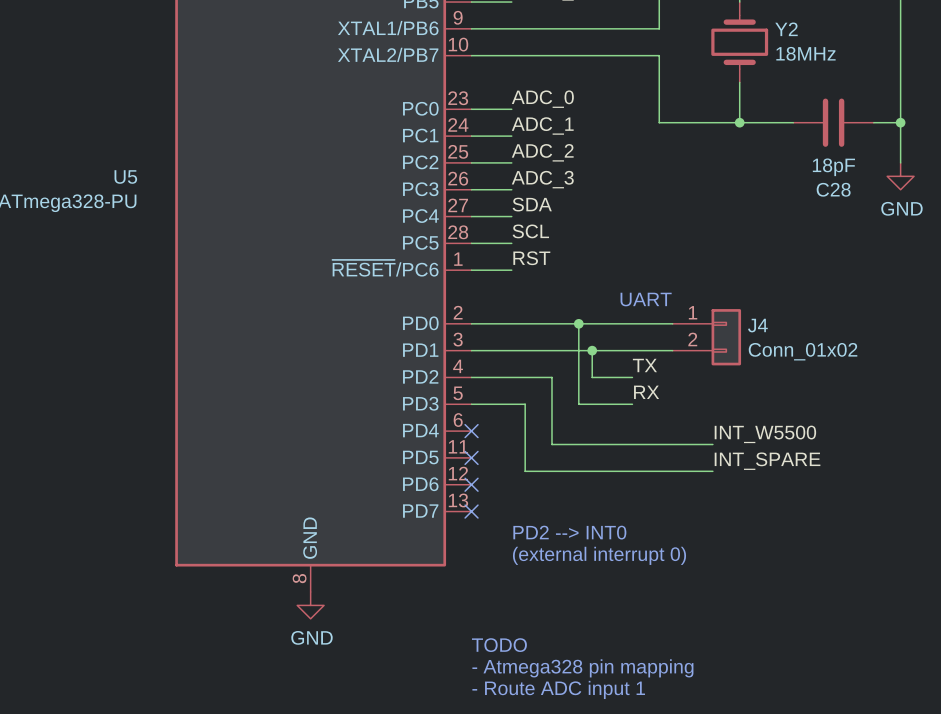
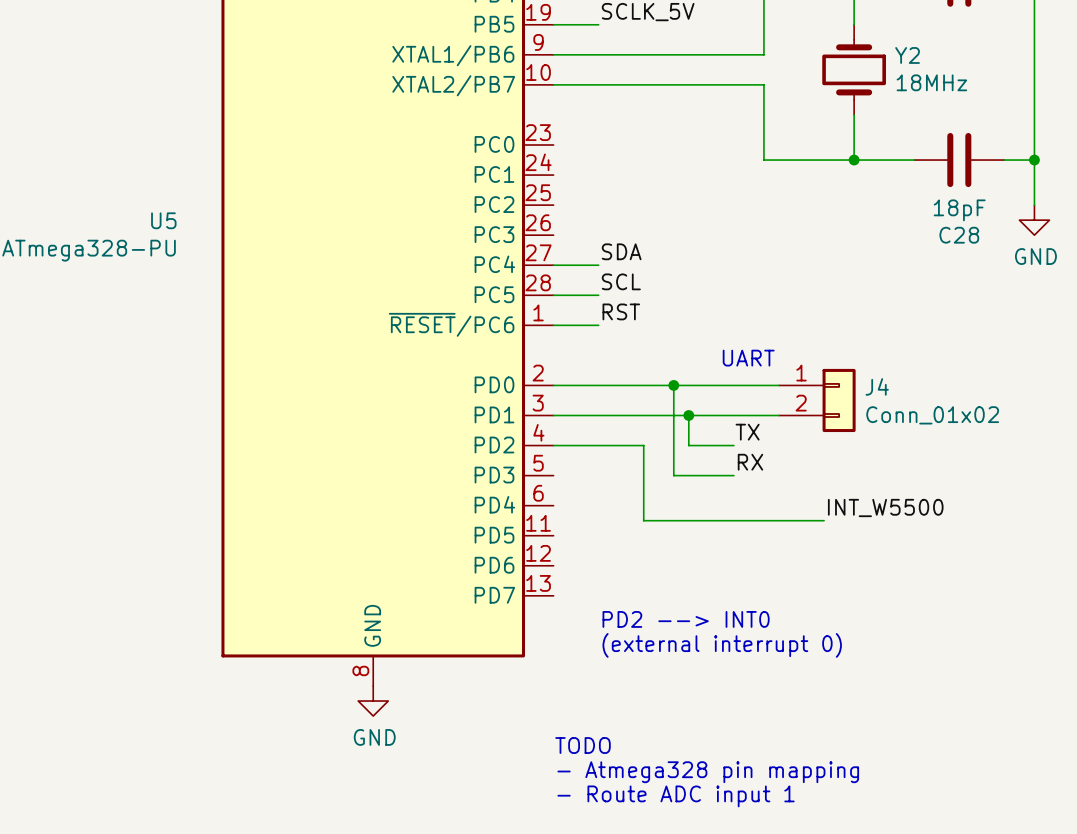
label: ADC_0 (542, 99) -> none
wire: (471, 109) (511, 109) -> none
label: ADC_1 (542, 125) -> none
wire: (471, 136) (511, 136) -> none
label: ADC_2 (542, 152) -> none
wire: (471, 162) (511, 162) -> none
label: ADC_3 (542, 179) -> none
wire: (471, 189) (511, 189) -> none
wire: (471, 404) (525, 404) (525, 471) (712, 471) -> none
no-connect mark: (471, 431) -> none
no-connect mark: (471, 457) -> none
label: INT_SPARE (767, 461) -> none
no-connect mark: (471, 484) -> none
no-connect mark: (471, 511) -> none

